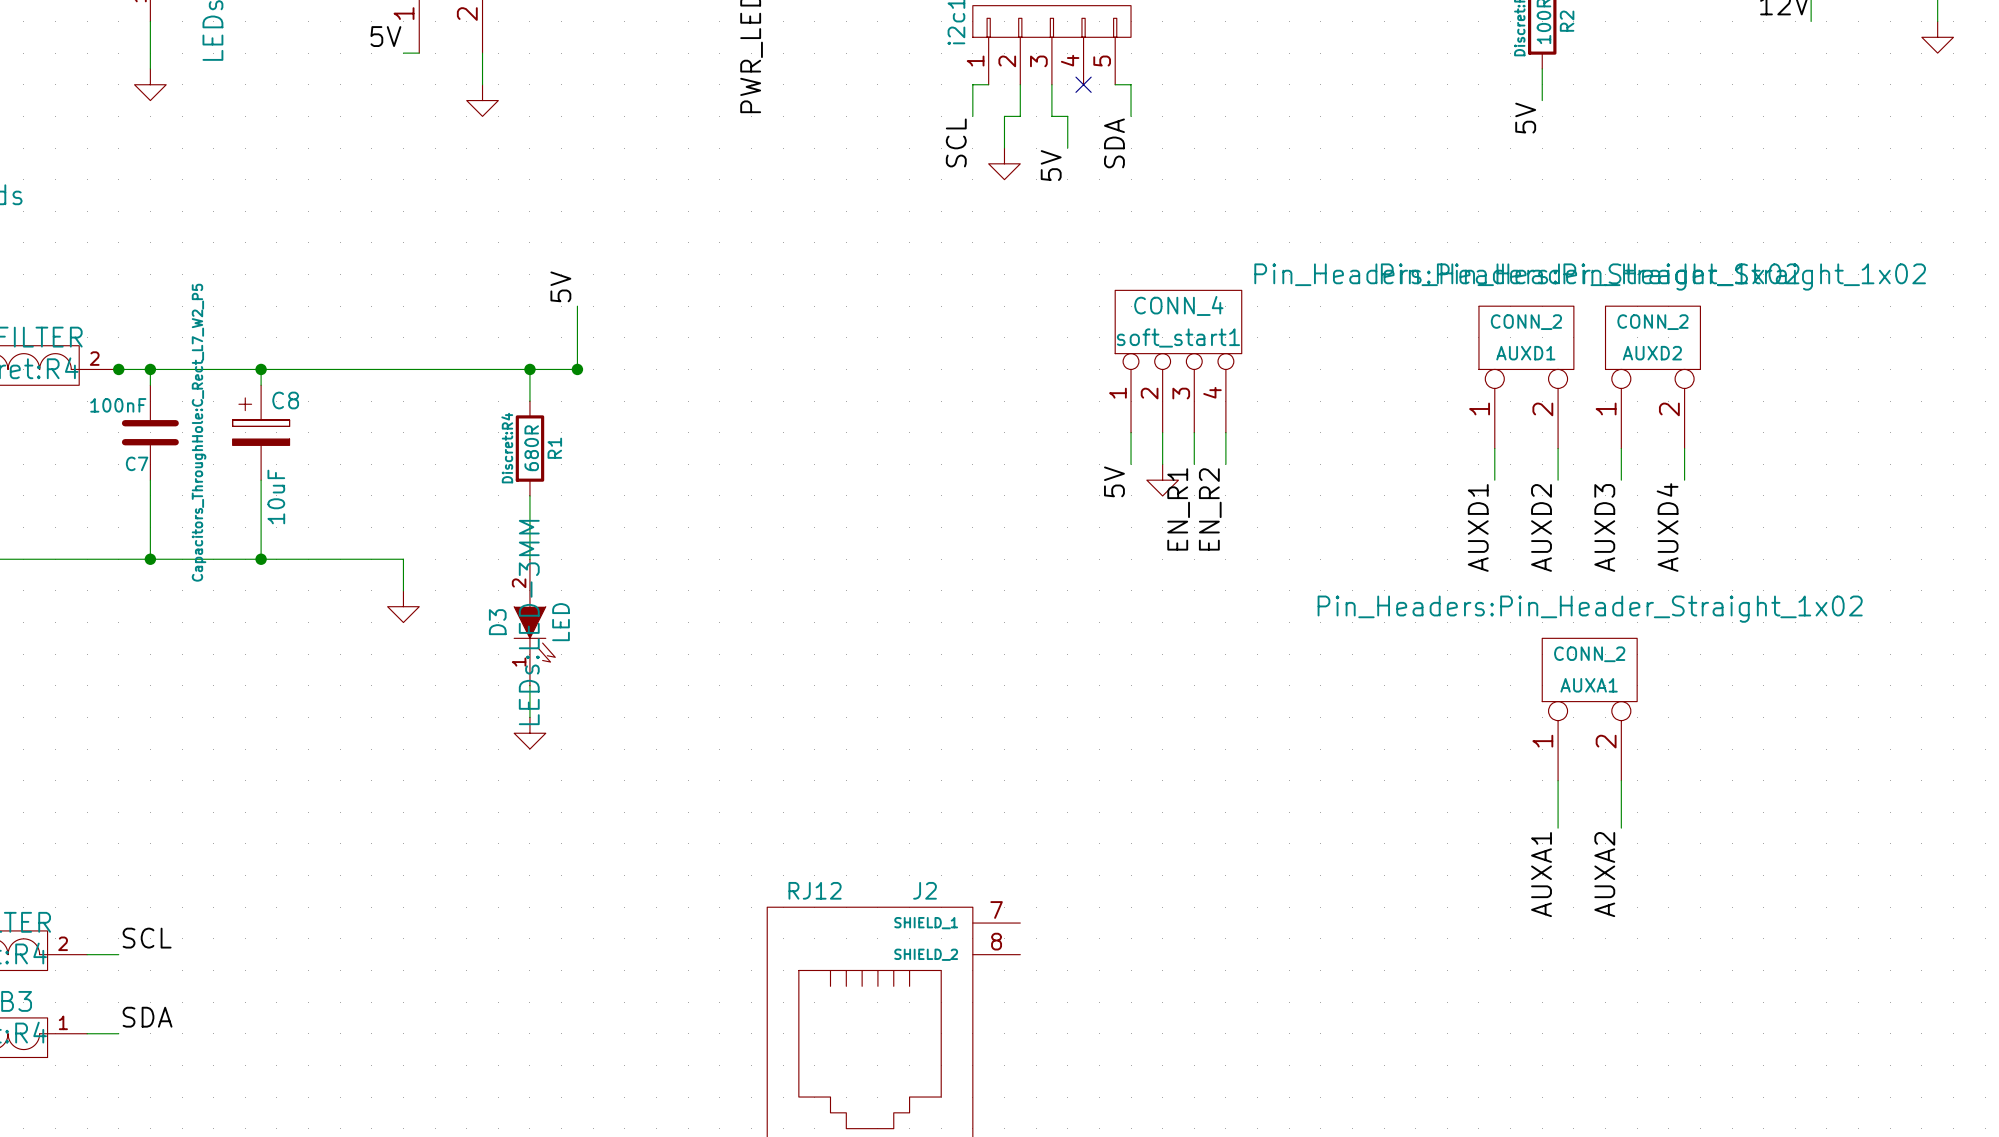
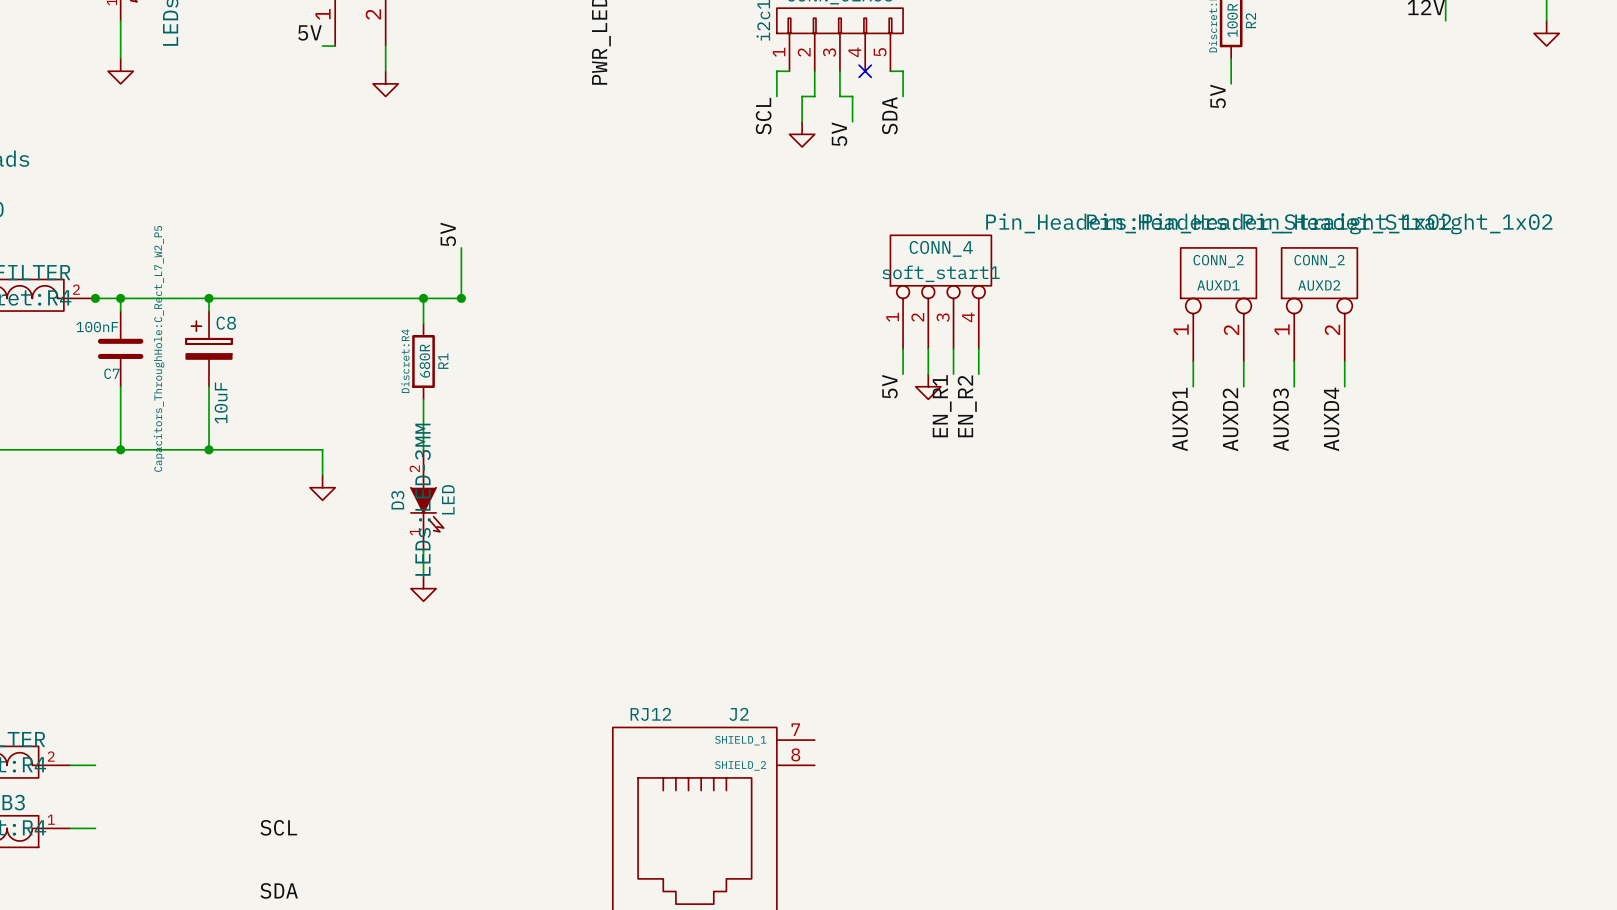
AUXA1: CONN_2 (1589, 709) -> none
wire: (1558, 780) (1558, 828) -> none
wire: (1621, 780) (1621, 828) -> none
label: AUXA1 (1541, 874) -> none
label: AUXA2 (1604, 874) -> none
label position: SCL (147, 938) -> SCL (278, 827)
label position: SDA (147, 1017) -> SDA (279, 890)

